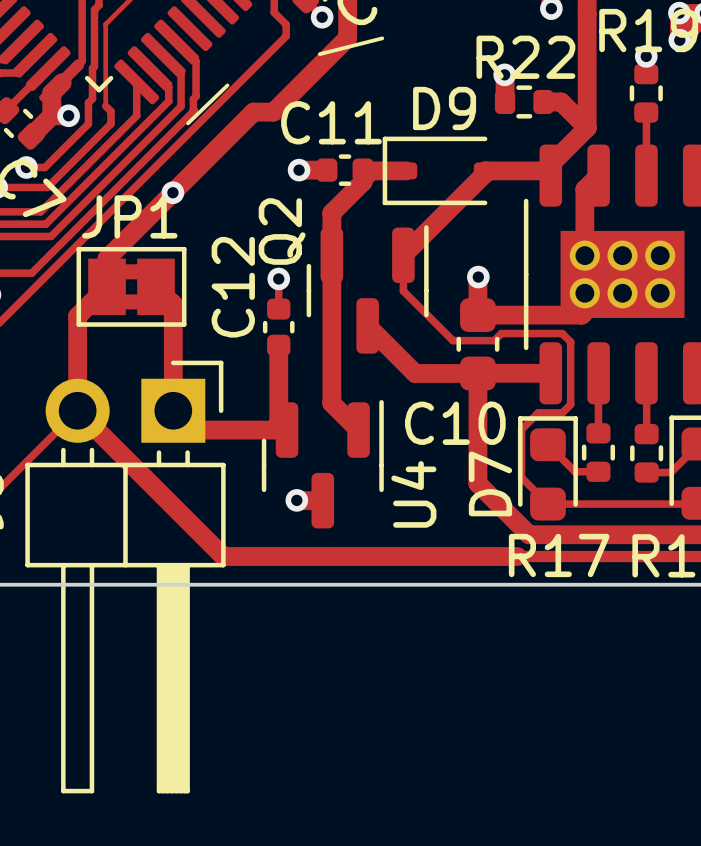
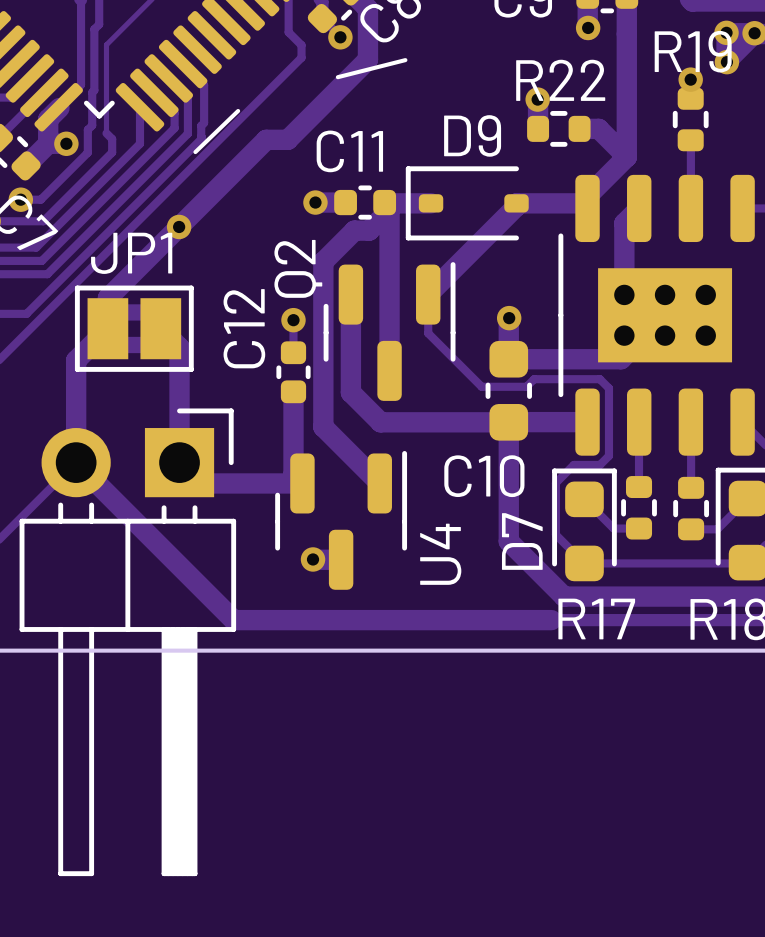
track: none -> (389, 207) (389, 370)
track: (348, 196) (331, 213) (331, 255) -> (369, 230) (354, 230) (323, 261) (323, 427) (350, 454)
track: (367, 325) (415, 373) -> (350, 392) (380, 422) (440, 422)
track: (331, 345) (331, 403) -> none

